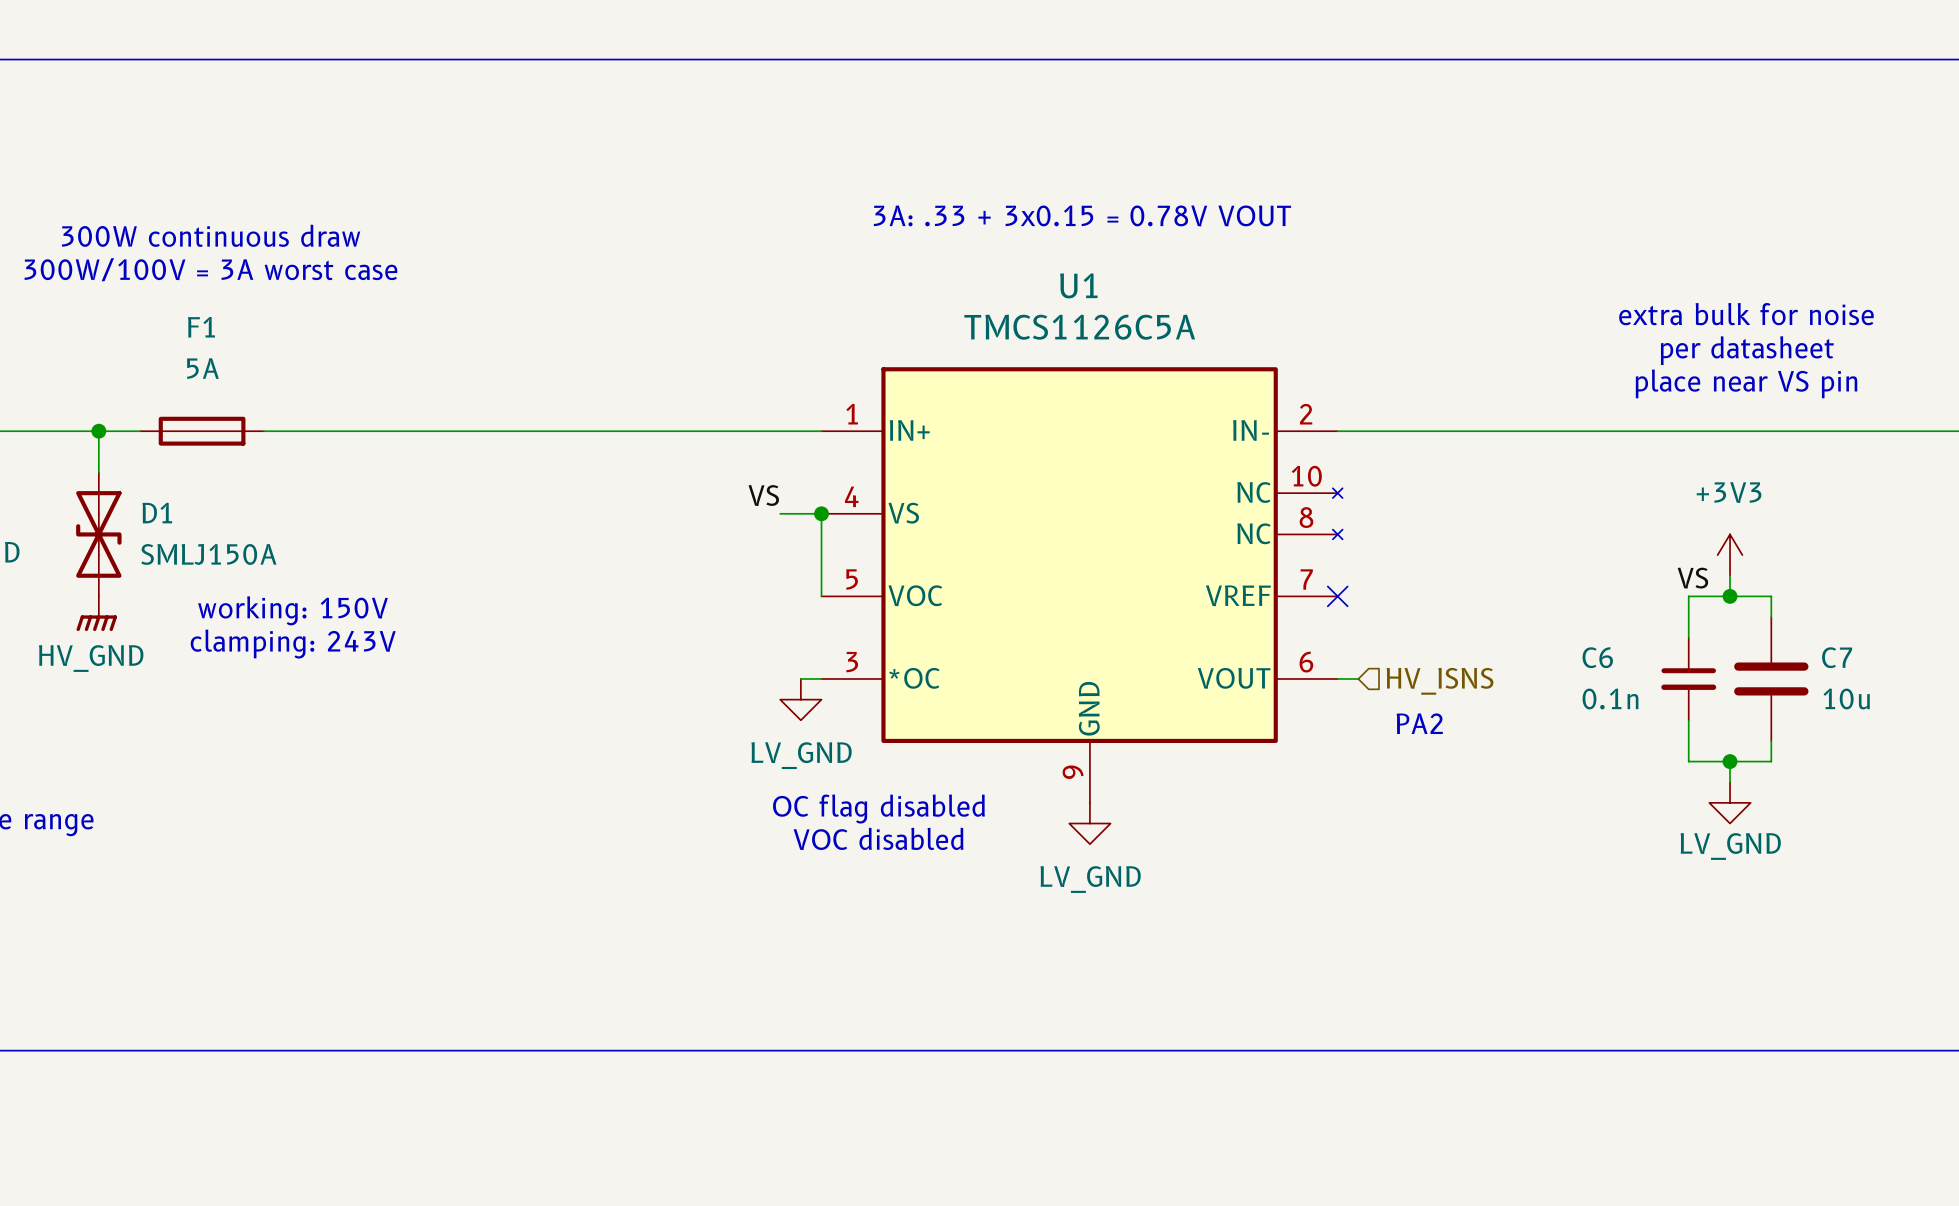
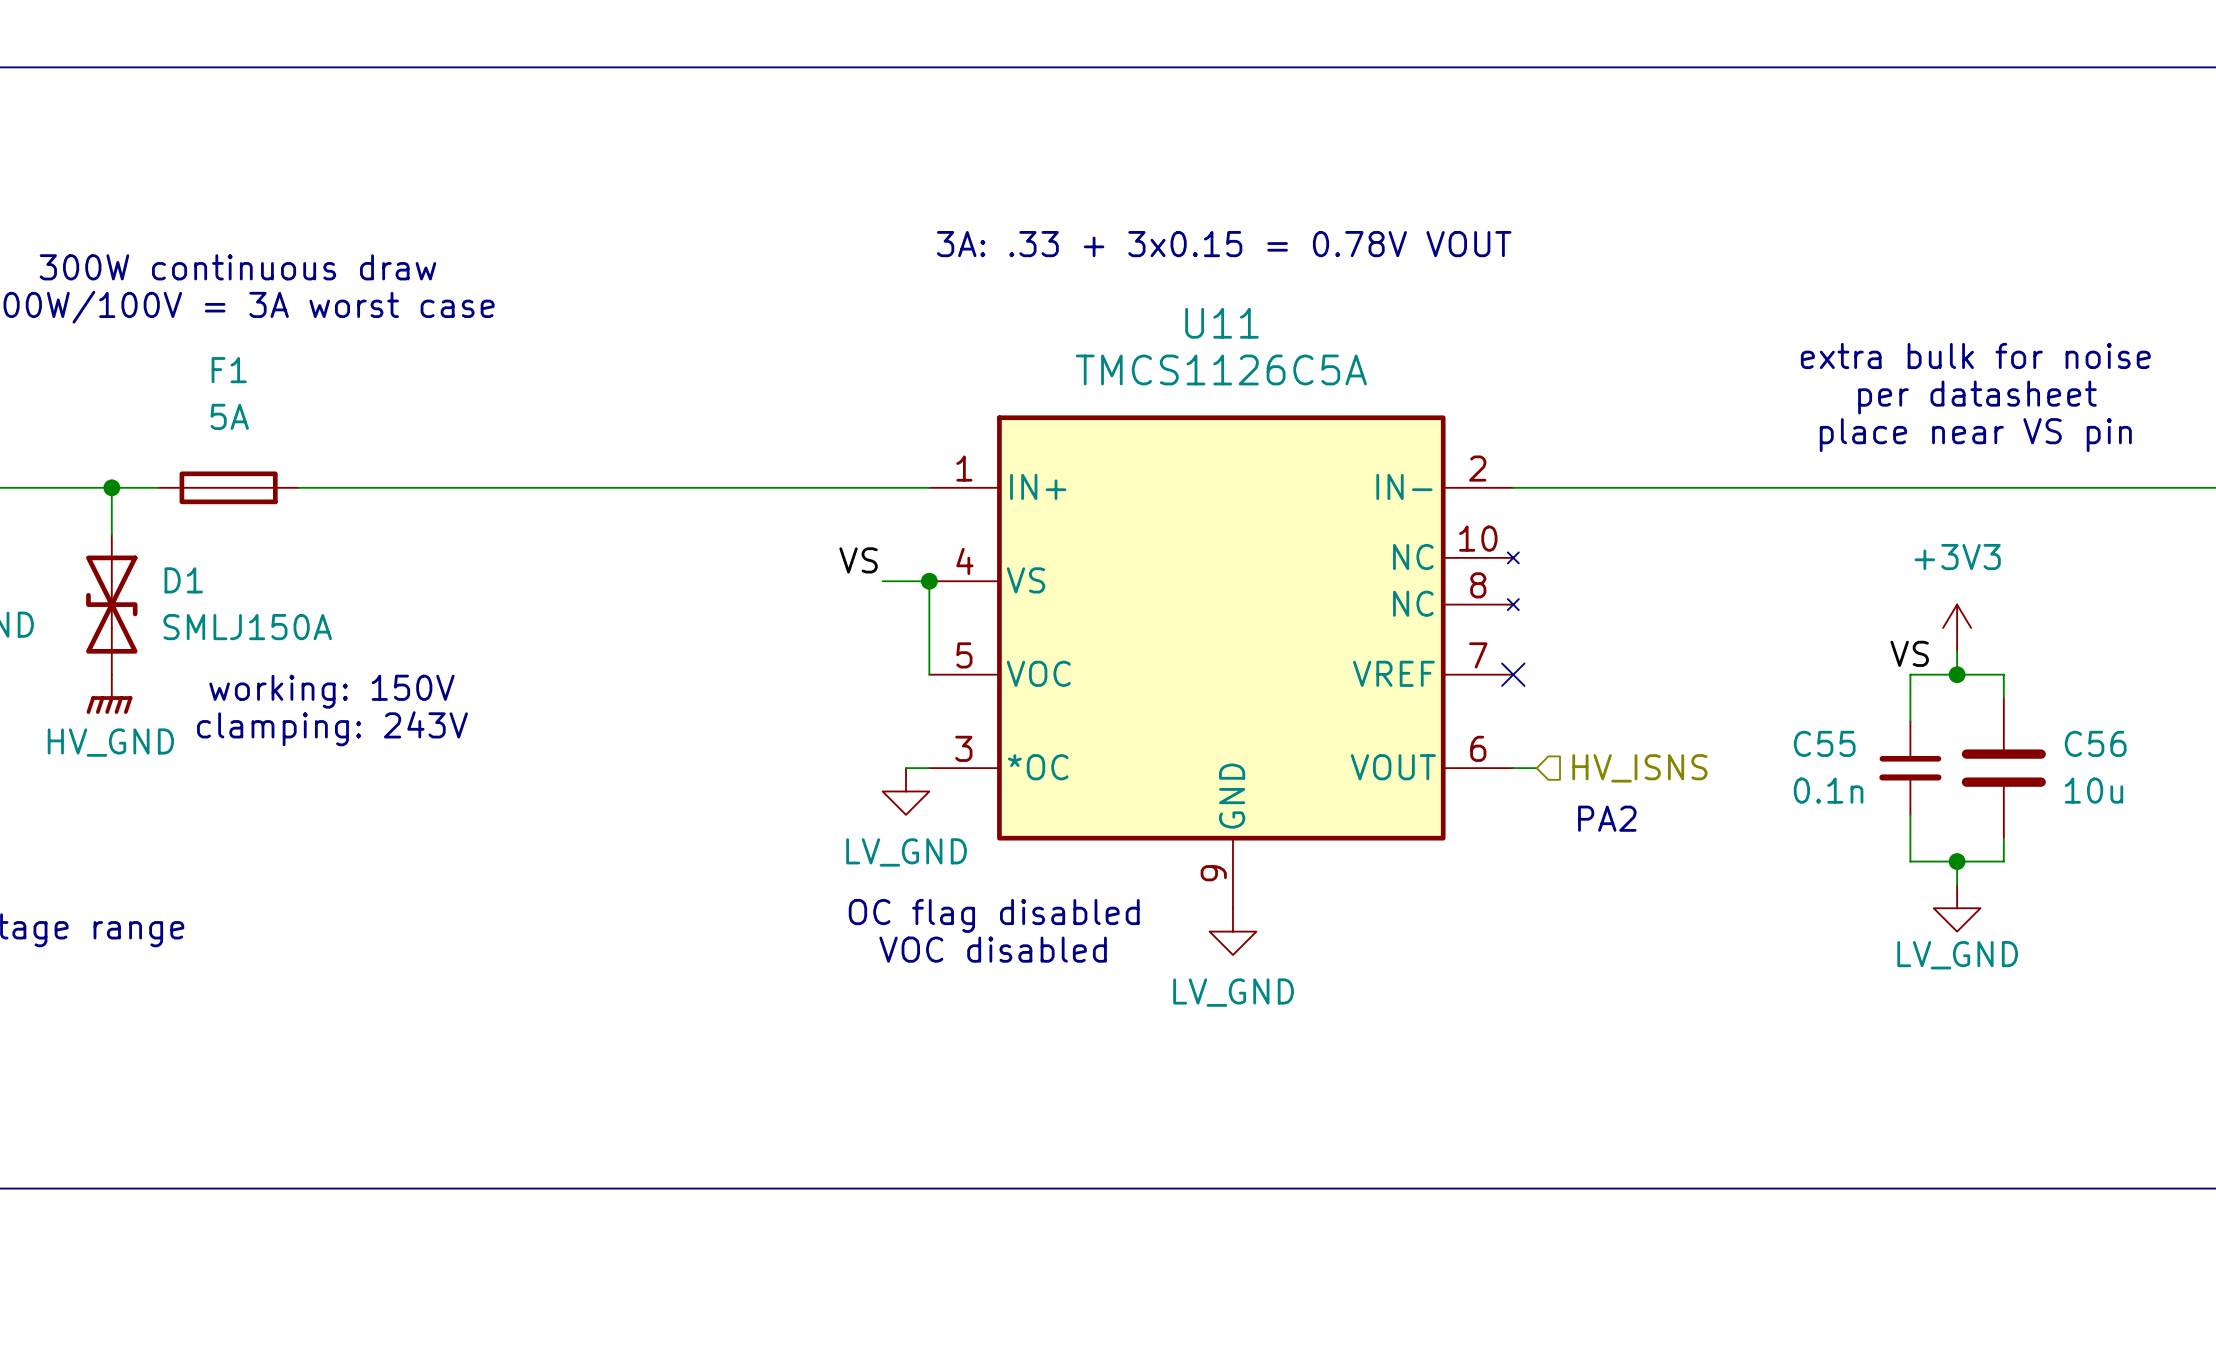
U1 name: U1 (1078, 285) -> U11 (1222, 323)
C6 name: C6 (1597, 657) -> C55 (1824, 743)
C7 name: C7 (1837, 657) -> C56 (2095, 743)

